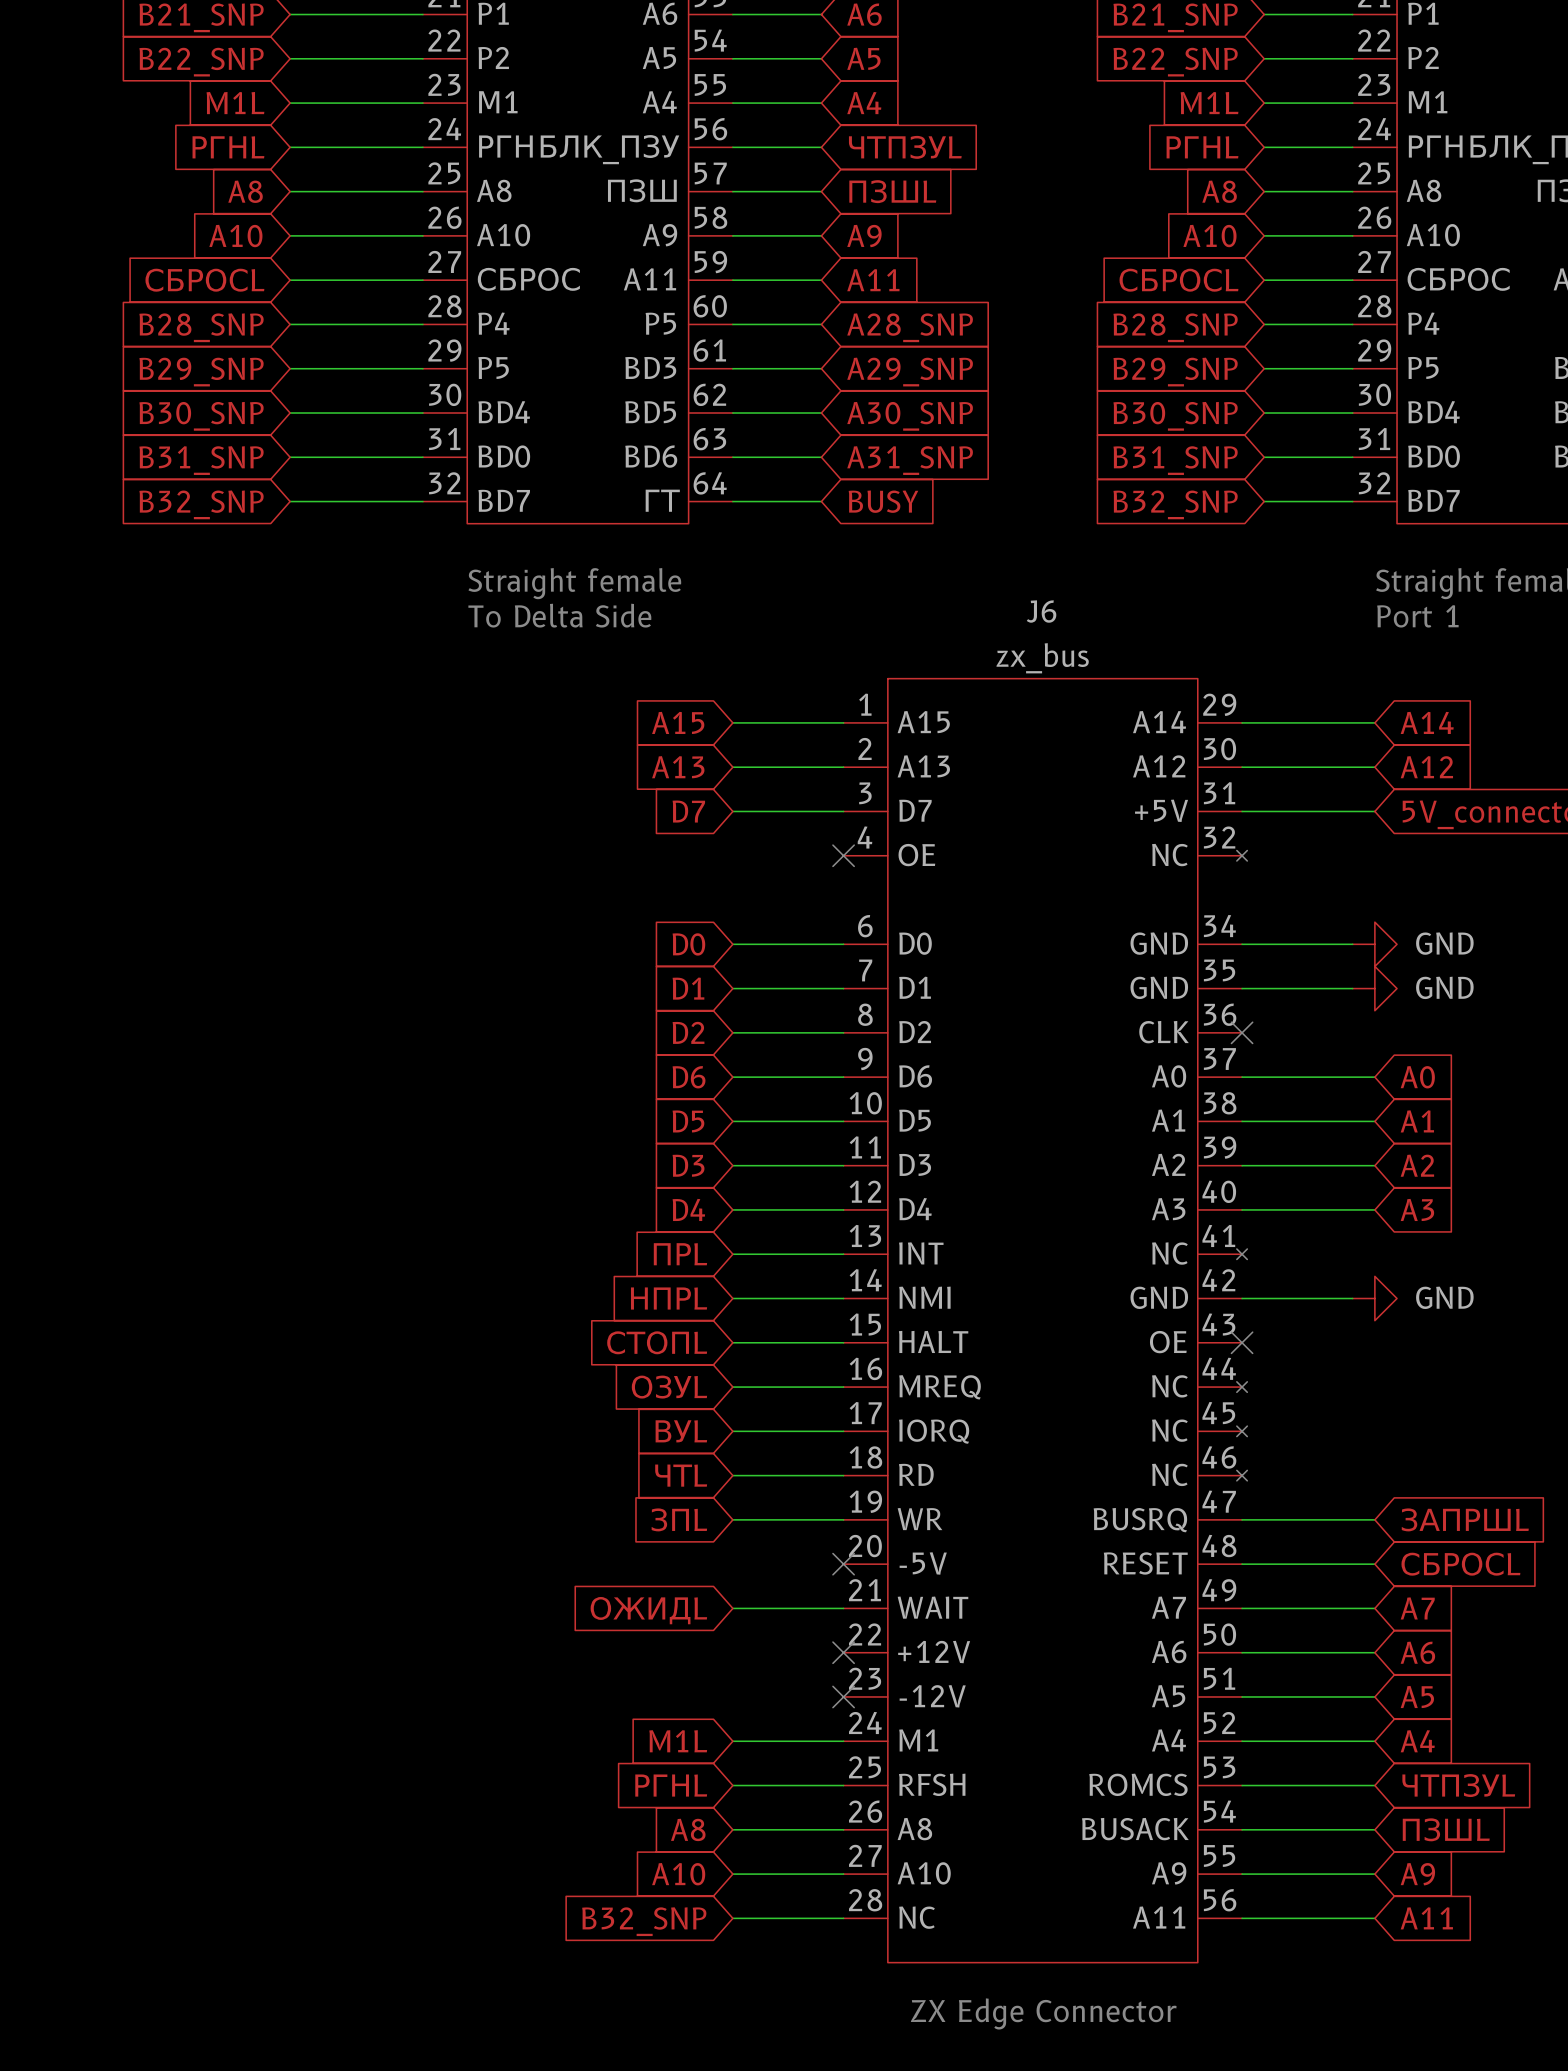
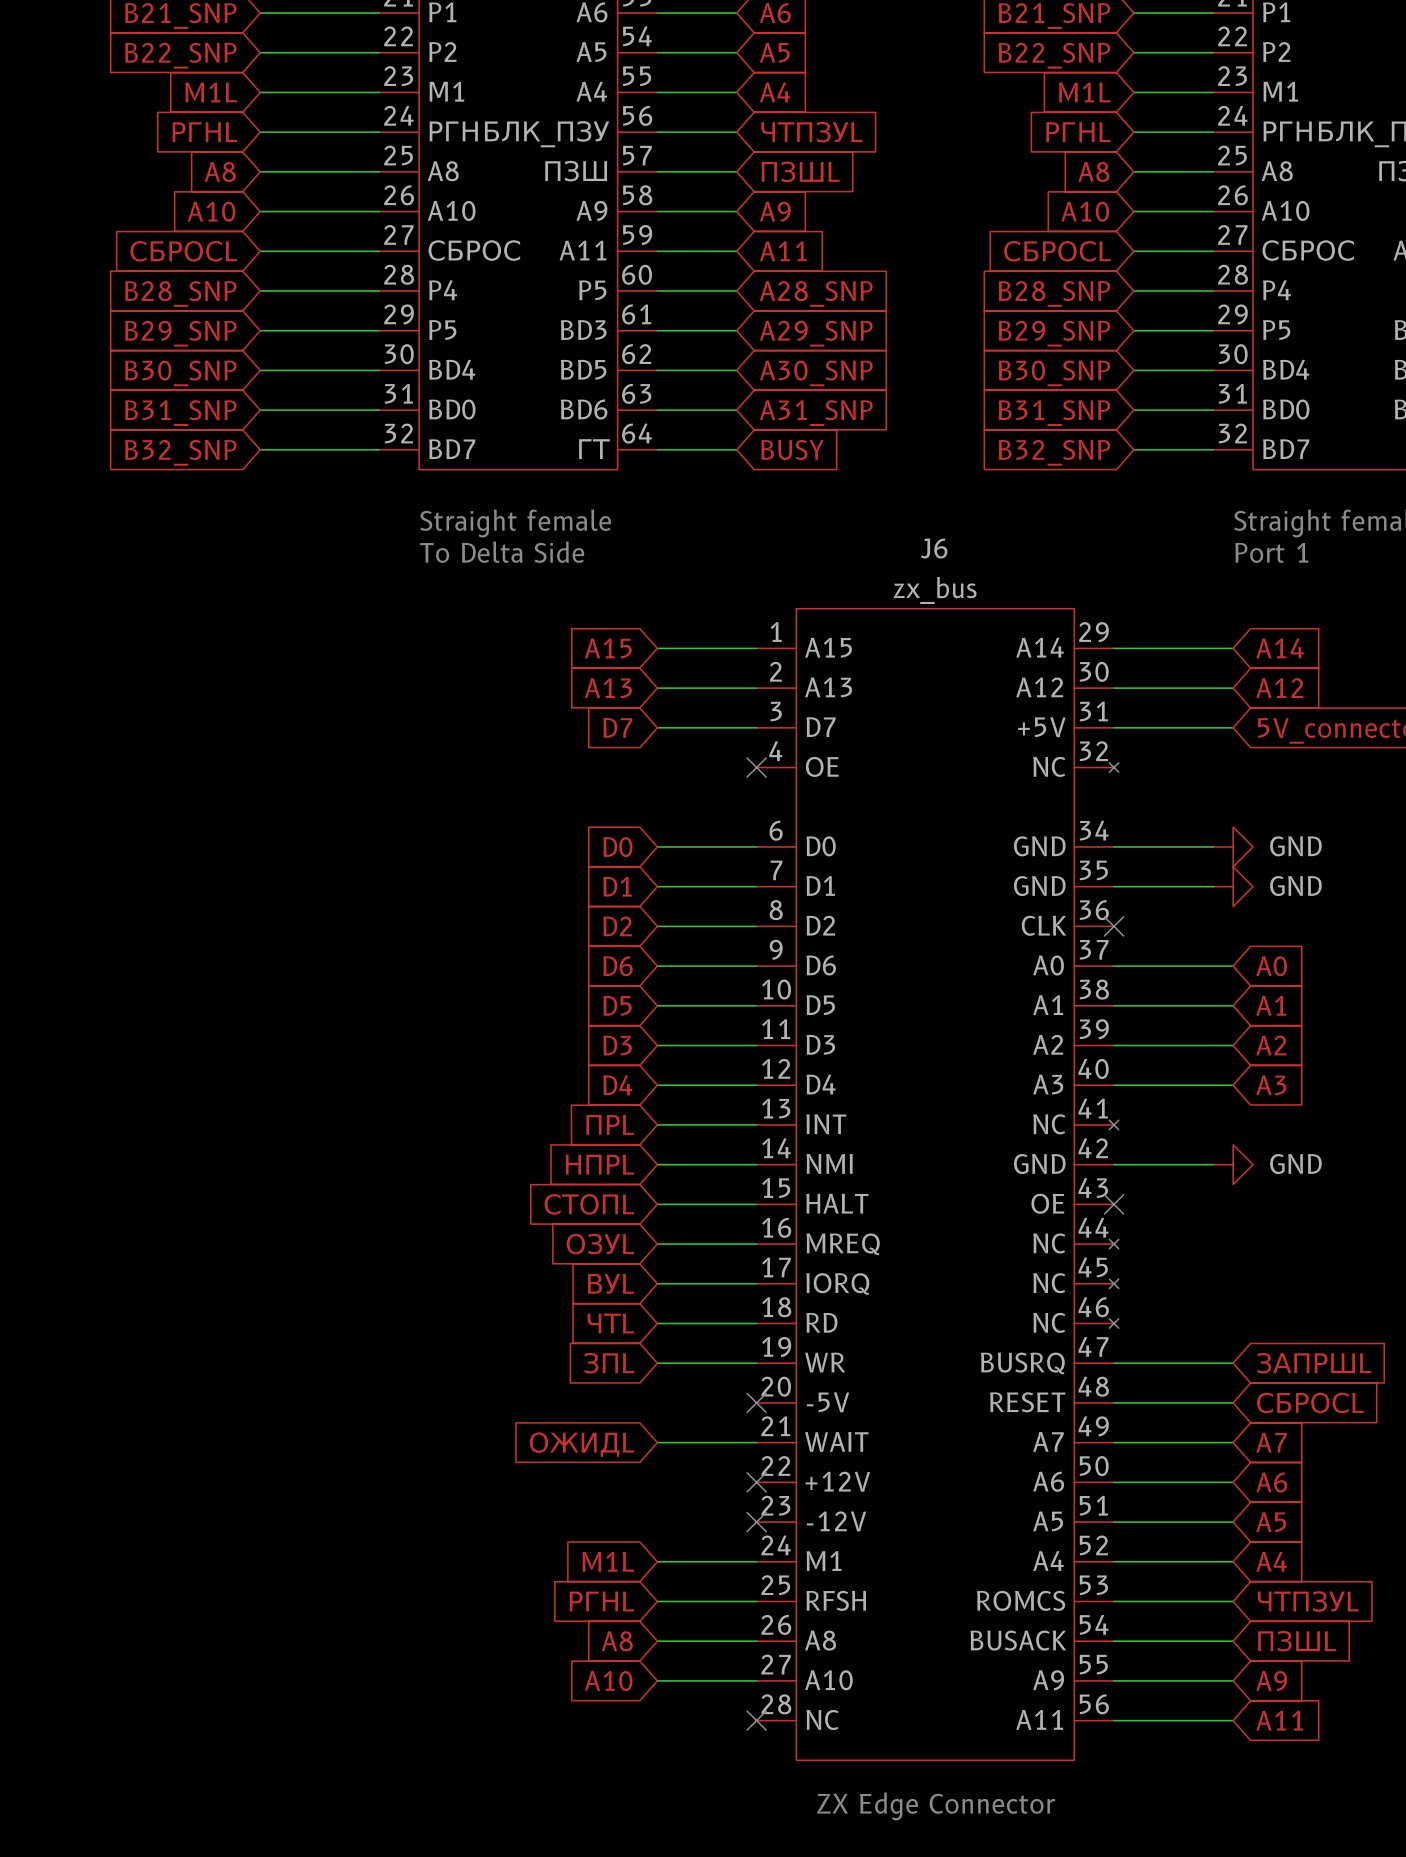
wire: (732, 1918) (843, 1918) -> none
no-connect mark: none -> (756, 1720)
global label: B32_SNP (644, 1921) -> none

